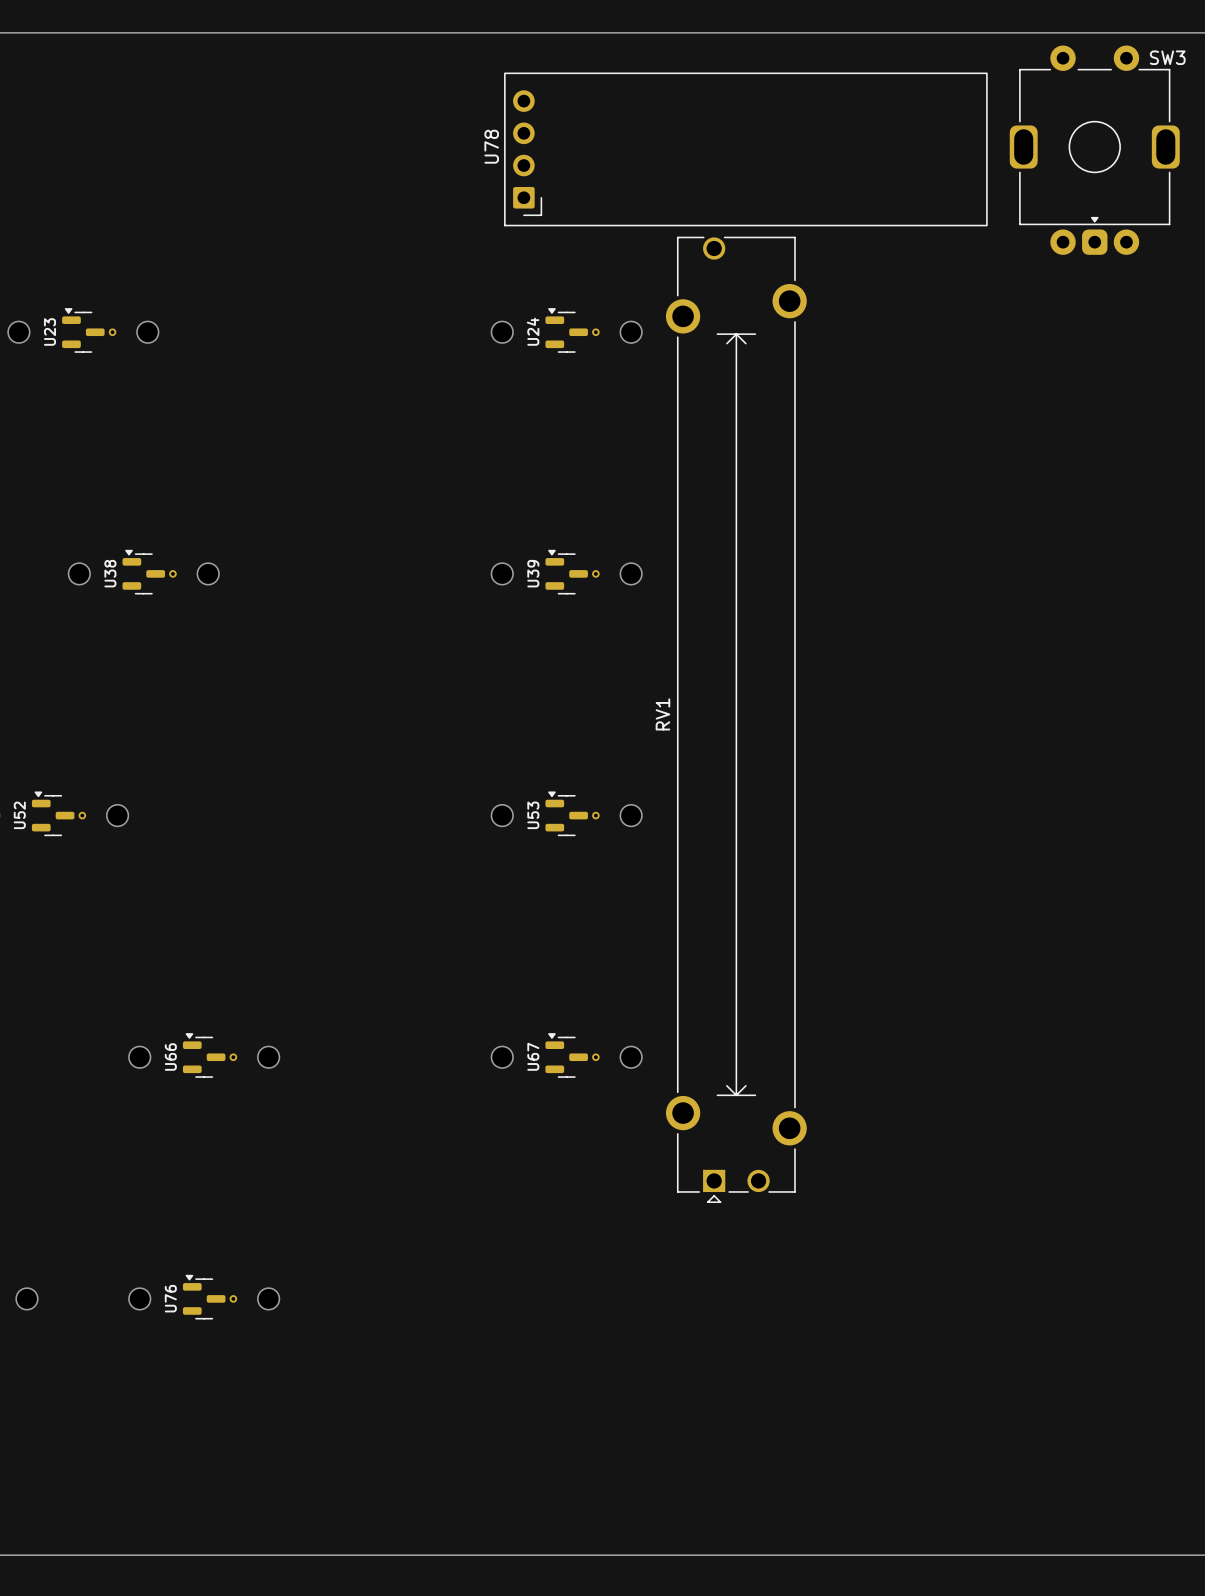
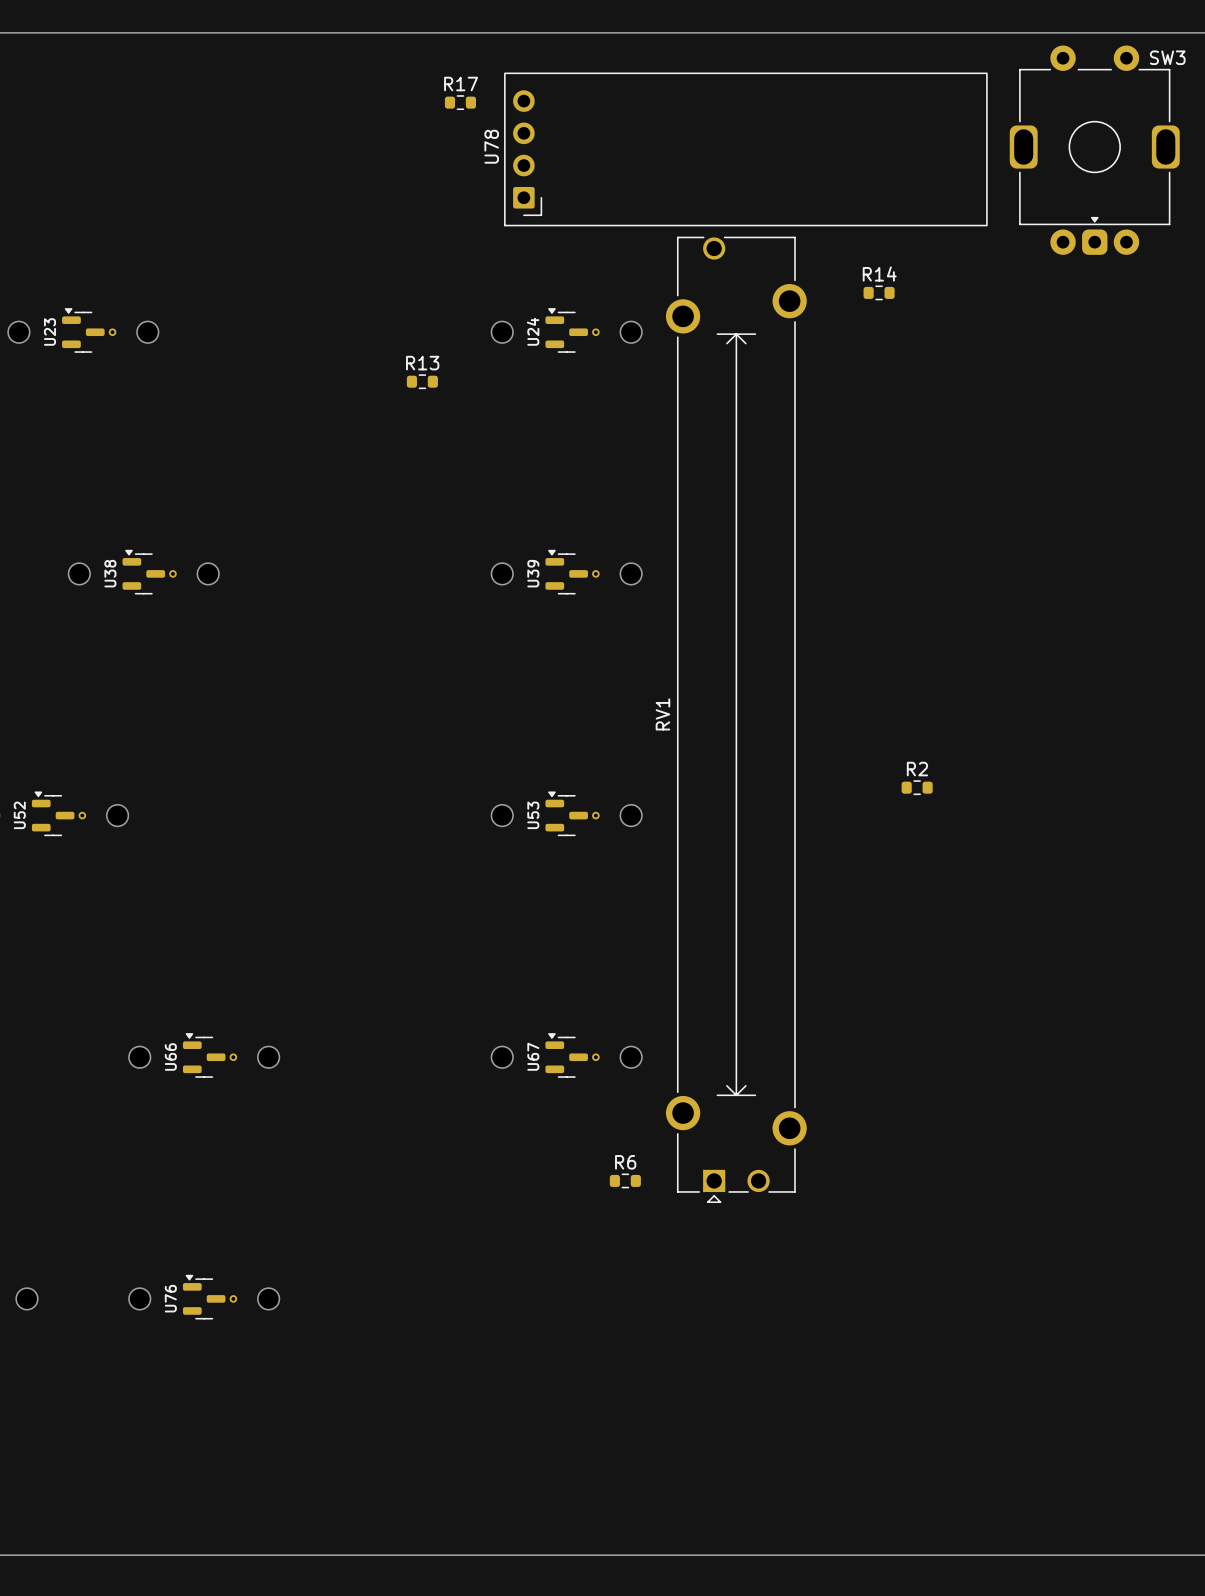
R17: none -> (460, 102)
R14: none -> (879, 292)
R13: none -> (422, 381)
R2: none -> (917, 787)
R6: none -> (625, 1180)

